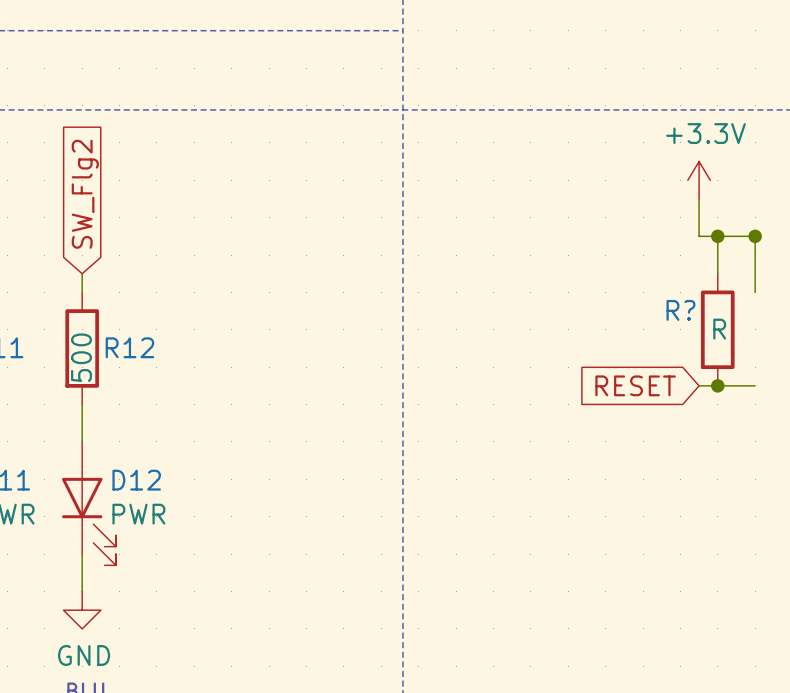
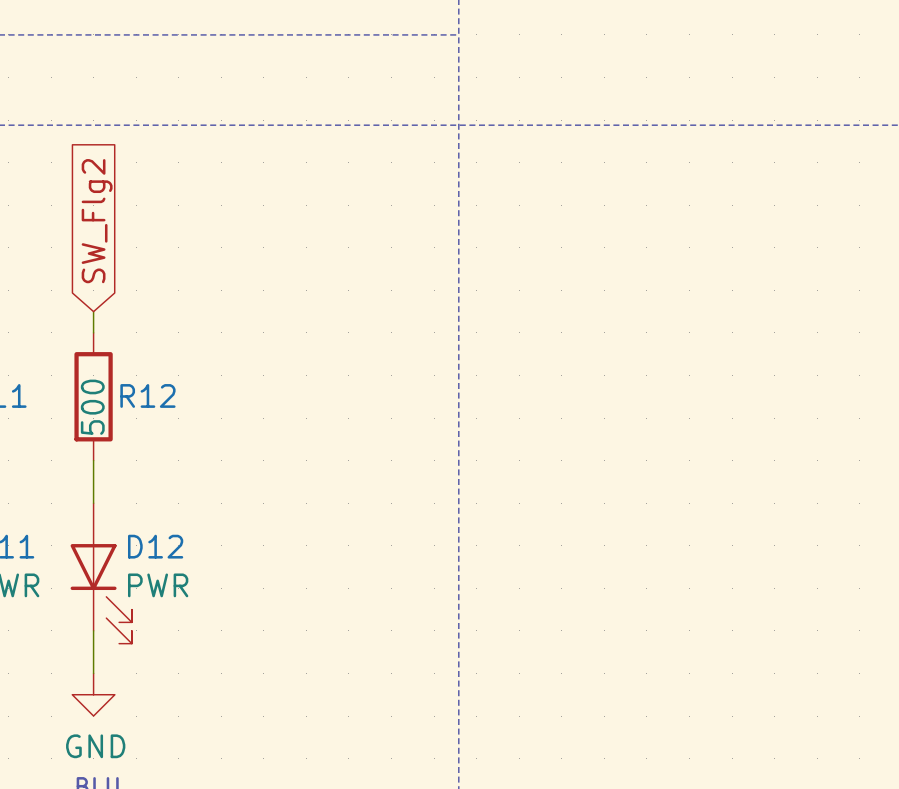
power symbol: +3.3V (699, 180) -> none
wire: (699, 198) (699, 236) (755, 236) (755, 292) -> none
wire: (717, 236) (717, 273) -> none
junction: (717, 236) -> none
junction: (755, 236) -> none
R?: R (717, 329) -> none
global label: RESET (635, 385) -> none
wire: (699, 385) (755, 385) -> none
junction: (717, 385) -> none

